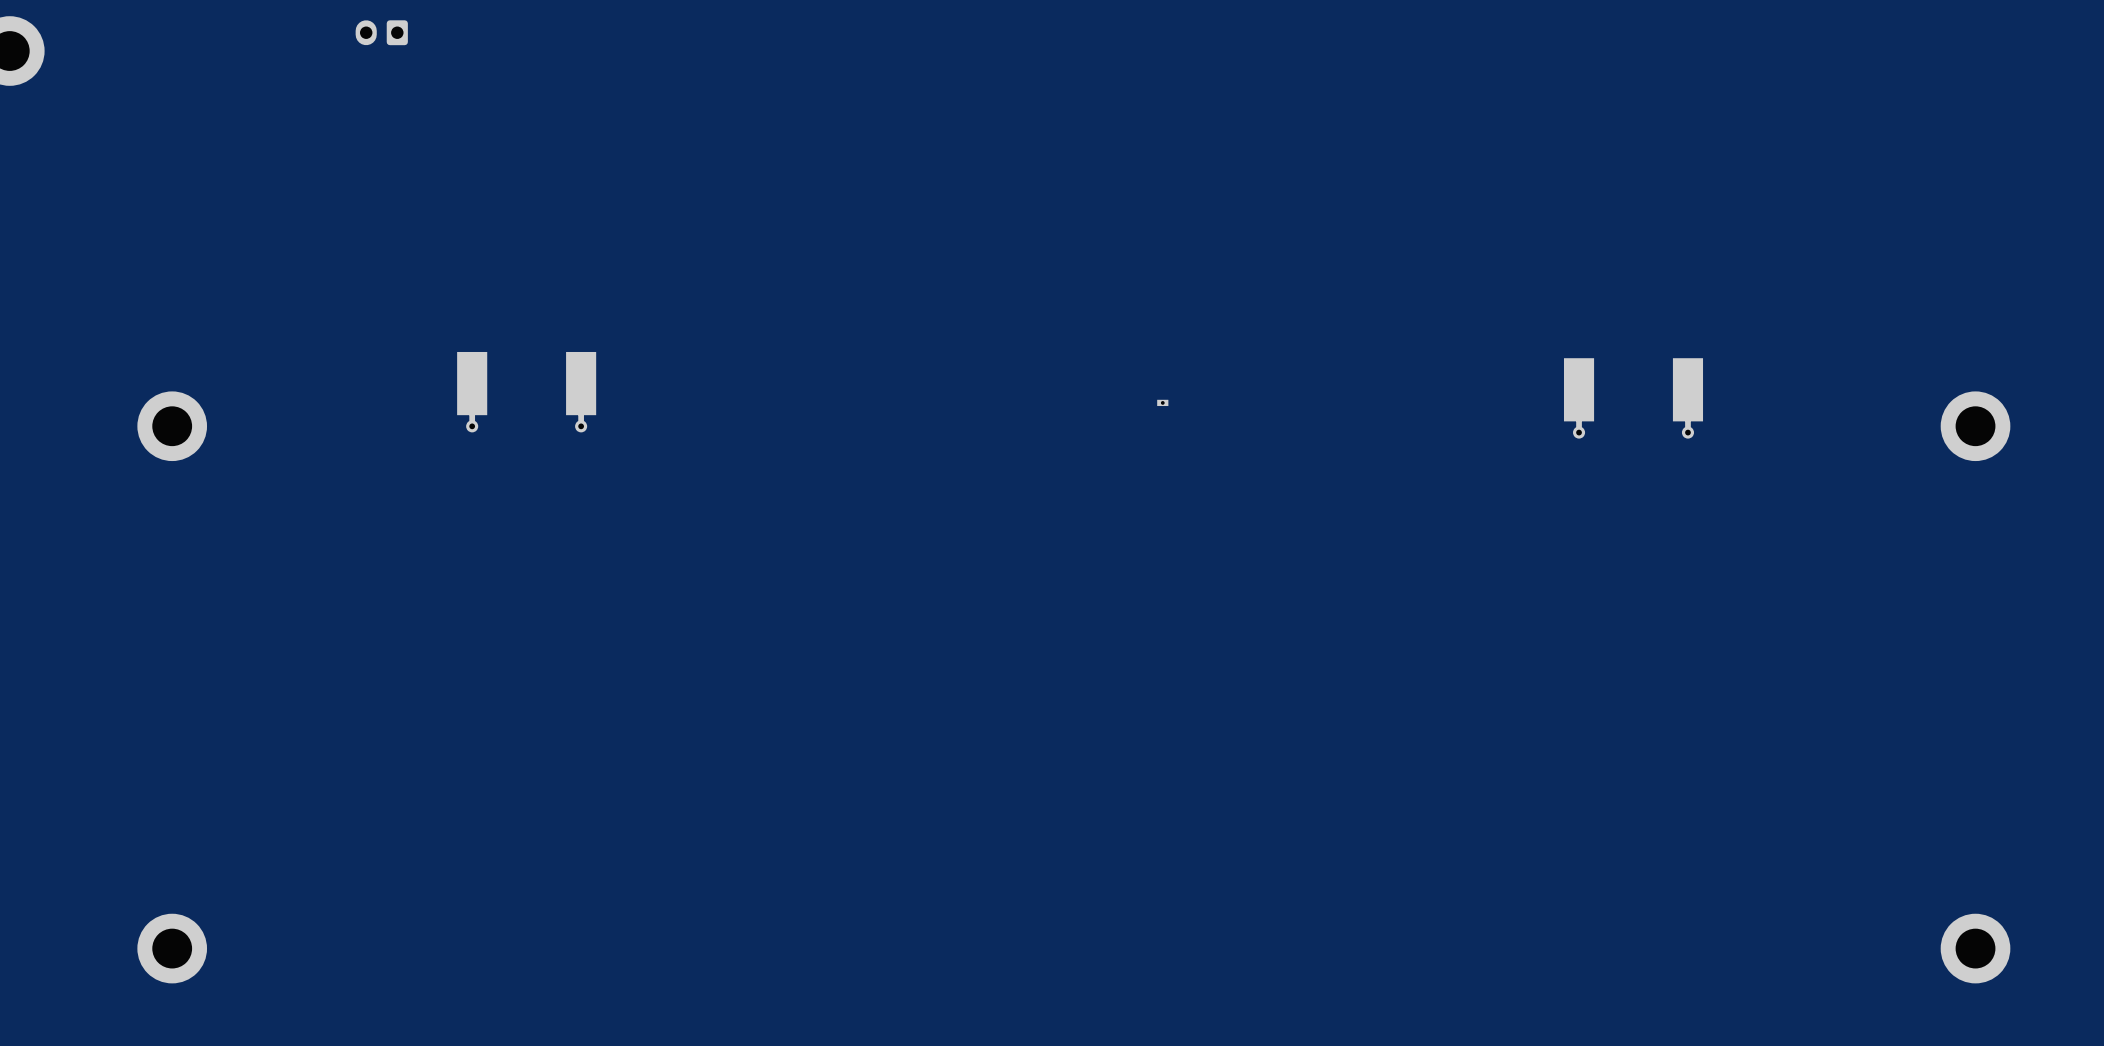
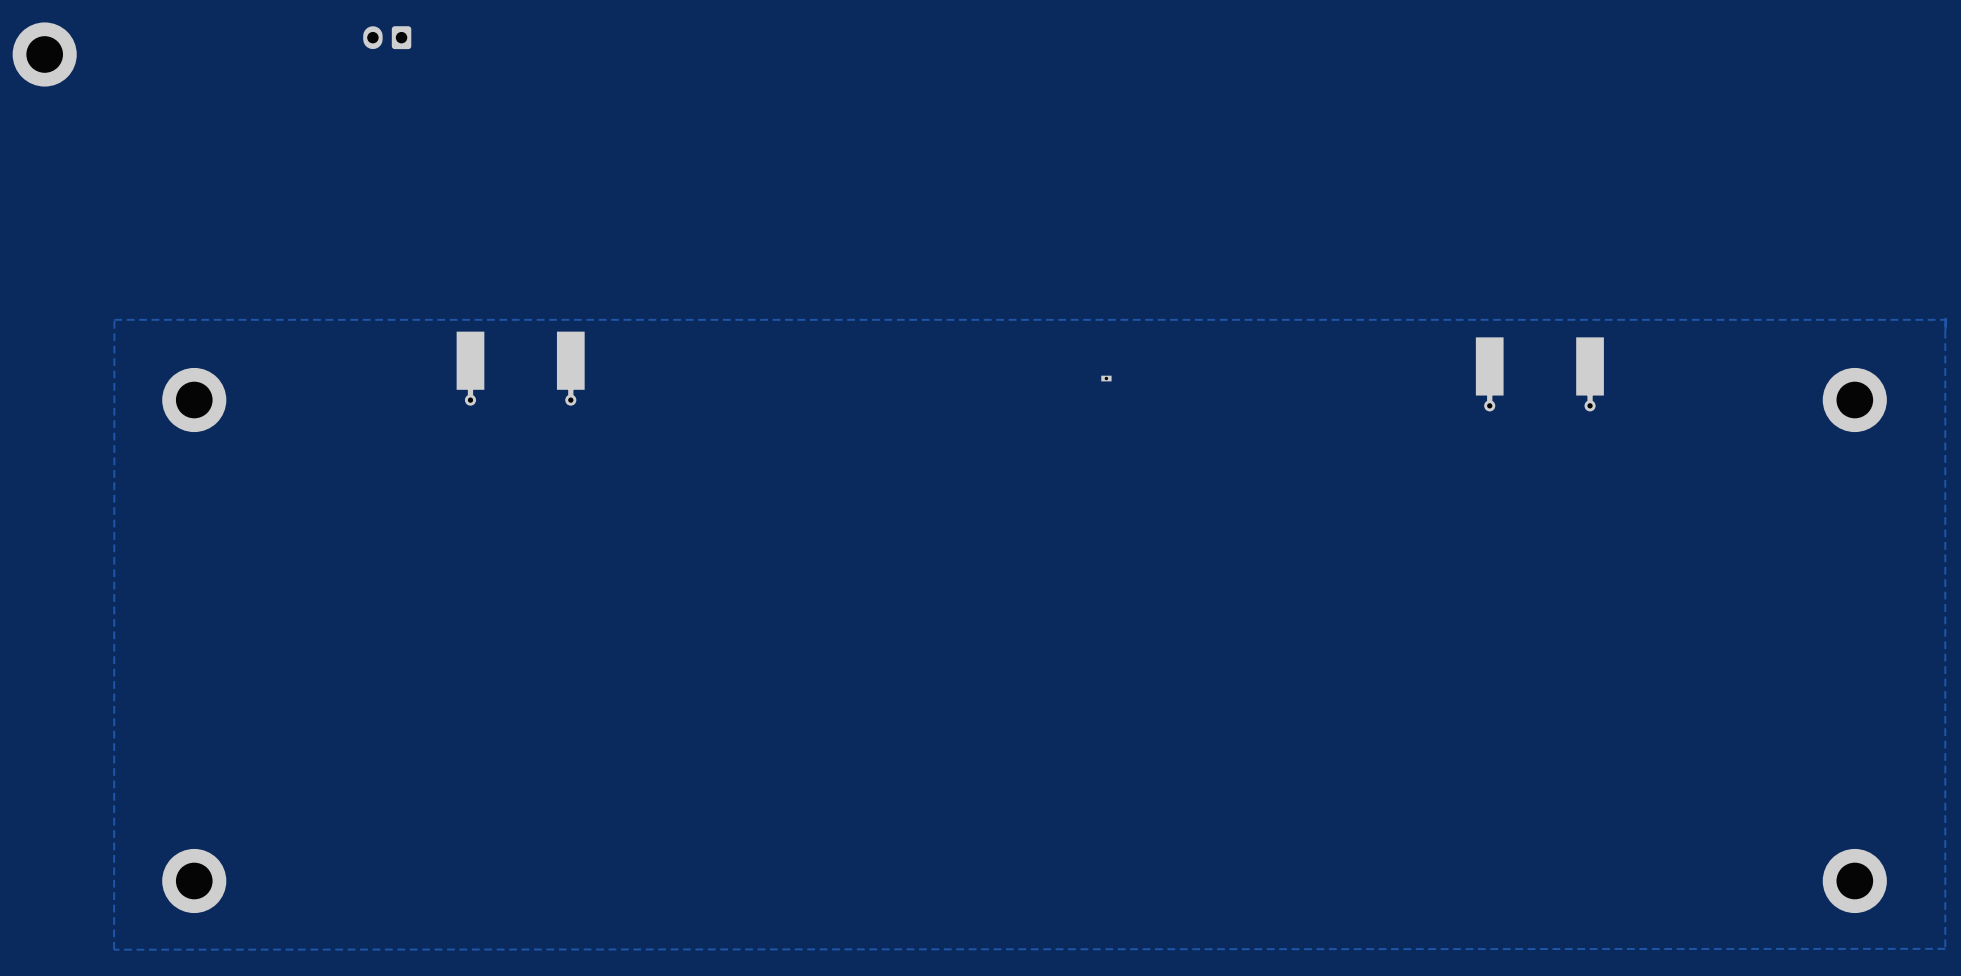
zone outline: none -> (1945, 318) (1945, 948) (114, 949) (114, 319) (1946, 319) (1945, 331) (1946, 319) (1945, 318)

